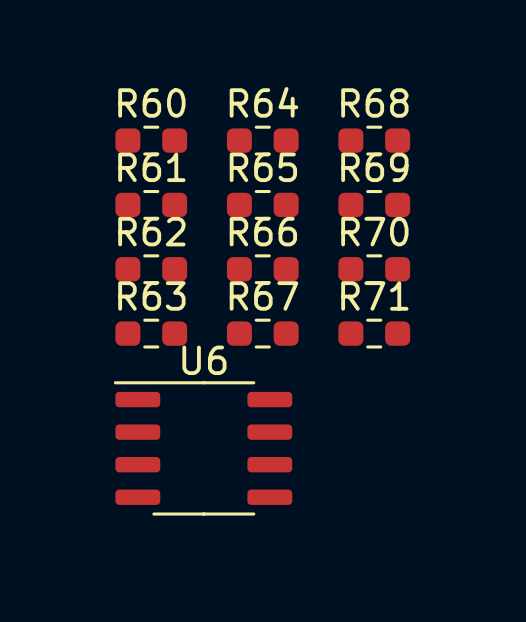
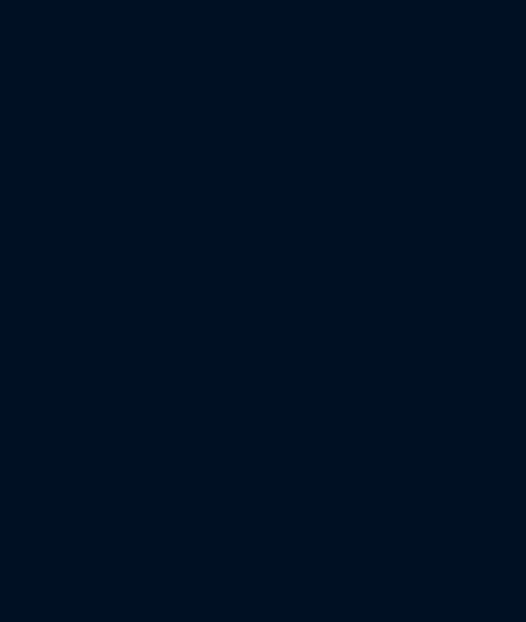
R60: (151, 140) -> none
R64: (262, 140) -> none
R68: (374, 140) -> none
R61: (151, 204) -> none
R65: (262, 204) -> none
R69: (374, 204) -> none
R62: (151, 269) -> none
R66: (262, 269) -> none
R70: (374, 269) -> none
R63: (151, 333) -> none
R67: (262, 333) -> none
R71: (374, 333) -> none
U6: (203, 448) -> none

